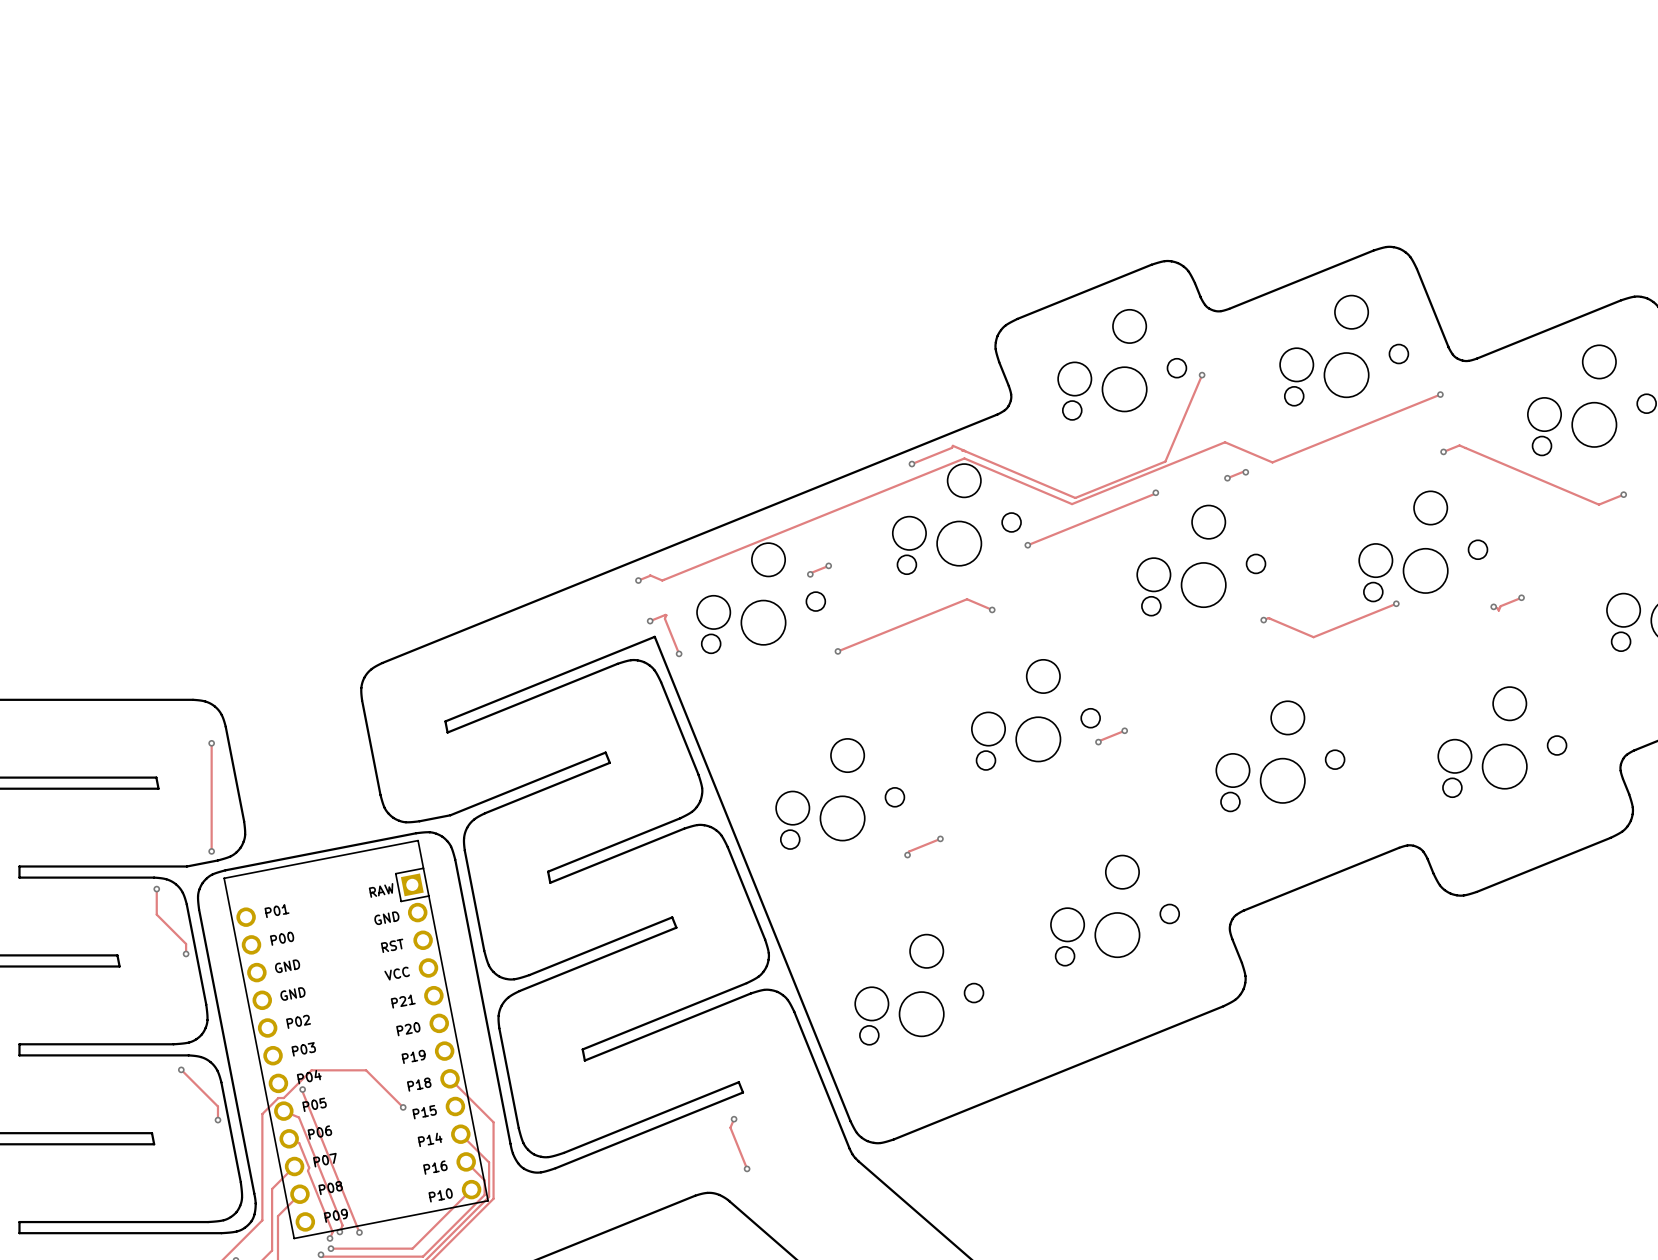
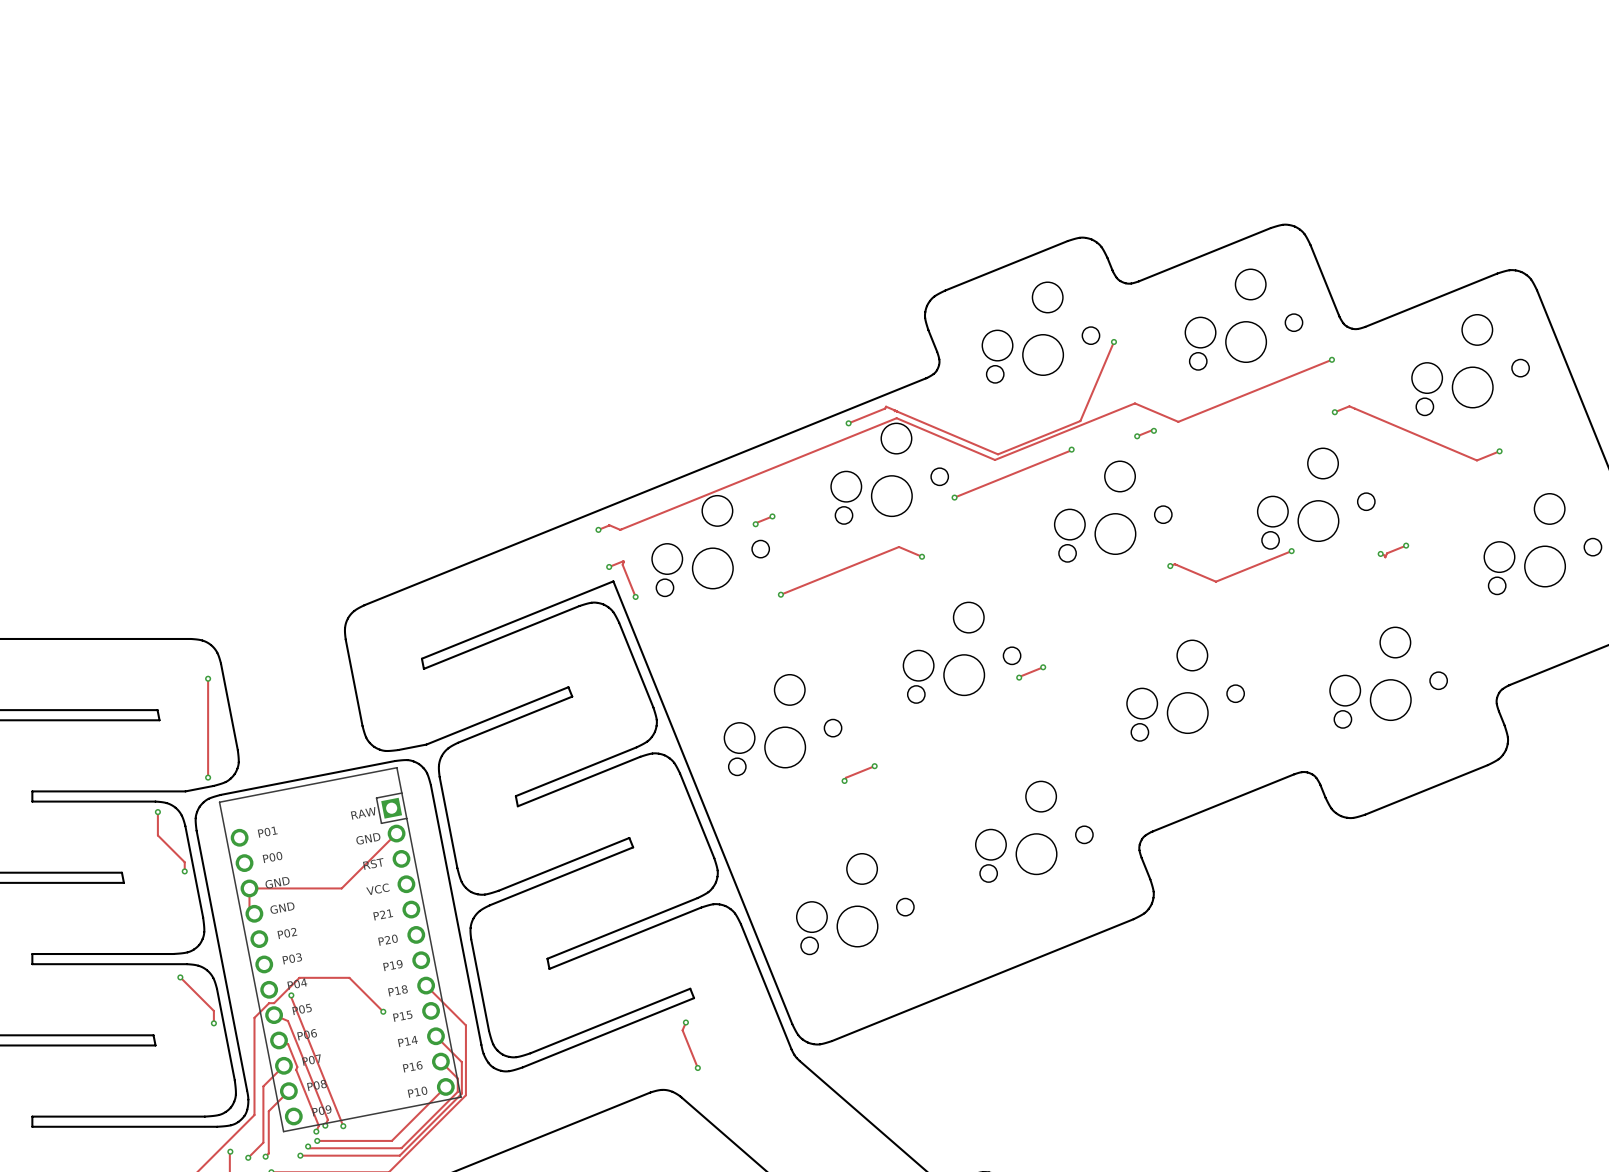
track: none -> (396, 833) (341, 888) (249, 888) (249, 908)

